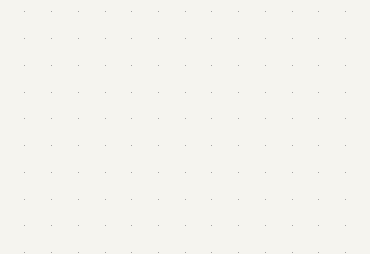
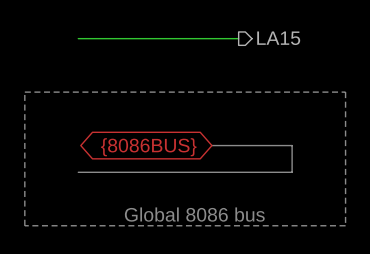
wire: none -> (78, 38) (238, 38)
hierarchical label: none -> LA15 (278, 38)
line: none -> (24, 92) (345, 92) (345, 225) (24, 225) (24, 92)
bus: none -> (211, 145) (292, 145) (292, 172) (78, 172)
global label: none -> {8086BUS} (148, 147)
text: none -> Global 8086 bus (194, 214)

